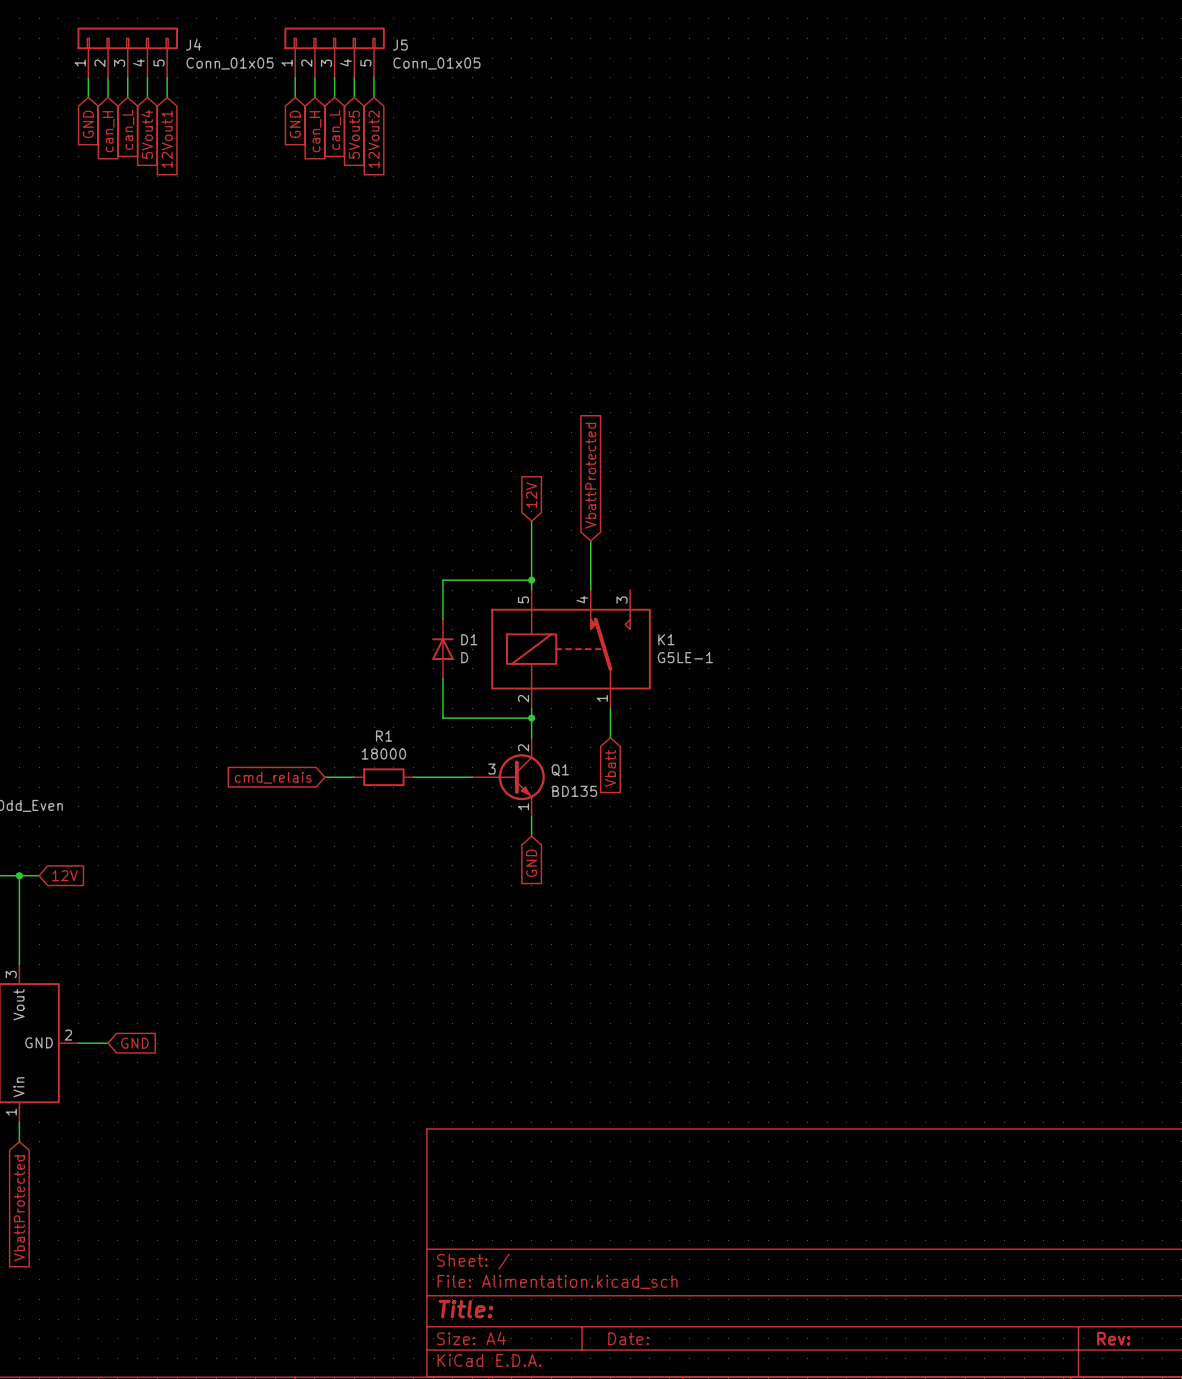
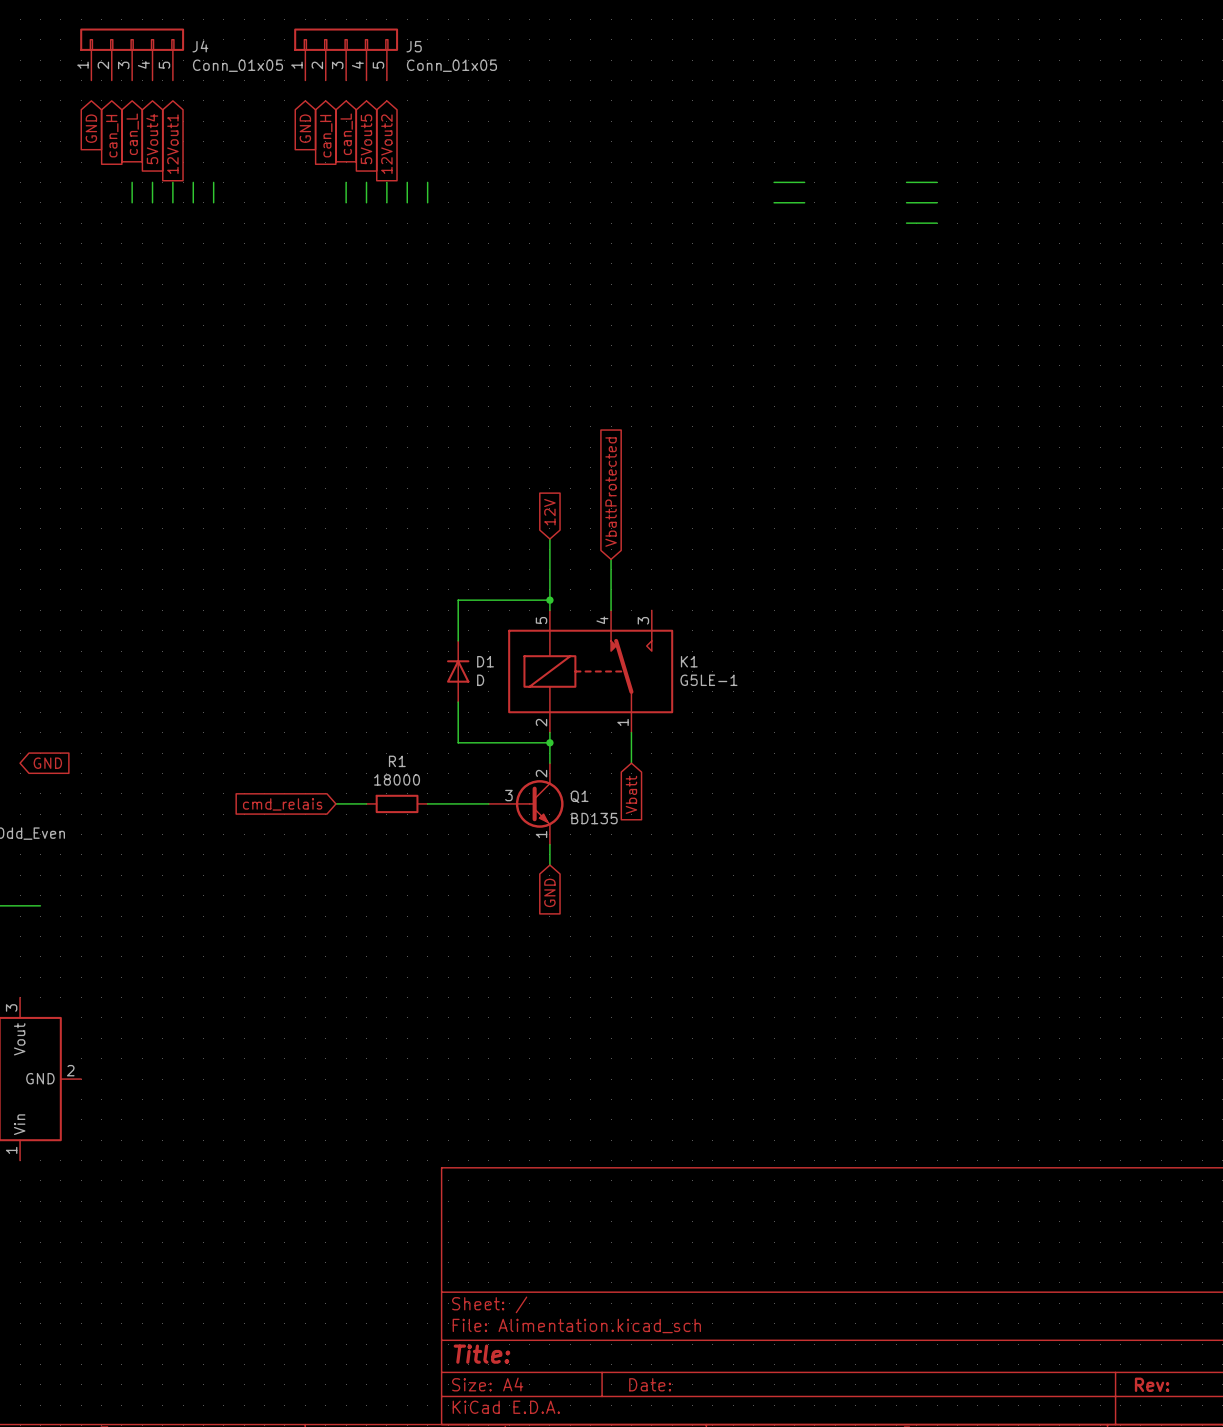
wire: (88, 77) (88, 97) -> (132, 182) (132, 202)
wire: (108, 77) (108, 97) -> (152, 182) (152, 202)
wire: (127, 77) (127, 97) -> (172, 182) (172, 202)
wire: (147, 77) (147, 97) -> (193, 182) (193, 202)
wire: (167, 77) (167, 97) -> (213, 182) (213, 202)
wire: (295, 77) (295, 97) -> (346, 182) (346, 202)
wire: (314, 77) (314, 97) -> (366, 182) (366, 202)
wire: (334, 77) (334, 97) -> (386, 182) (386, 202)
wire: (354, 77) (354, 97) -> (407, 182) (407, 202)
wire: (374, 77) (374, 97) -> (427, 182) (427, 202)
wire: none -> (774, 182) (804, 182)
wire: none -> (906, 182) (937, 182)
wire: none -> (774, 202) (804, 202)
wire: none -> (906, 202) (937, 202)
wire: none -> (906, 223) (937, 223)
global label: none -> GND (47, 763)
wire: (19, 875) (19, 964) -> none
junction: (19, 875) -> none
global label: 12V (65, 875) -> none
wire: (78, 1043) (108, 1043) -> none
global label: GND (134, 1043) -> none
wire: (19, 1122) (19, 1141) -> none
global label: VbattProtected (19, 1208) -> none

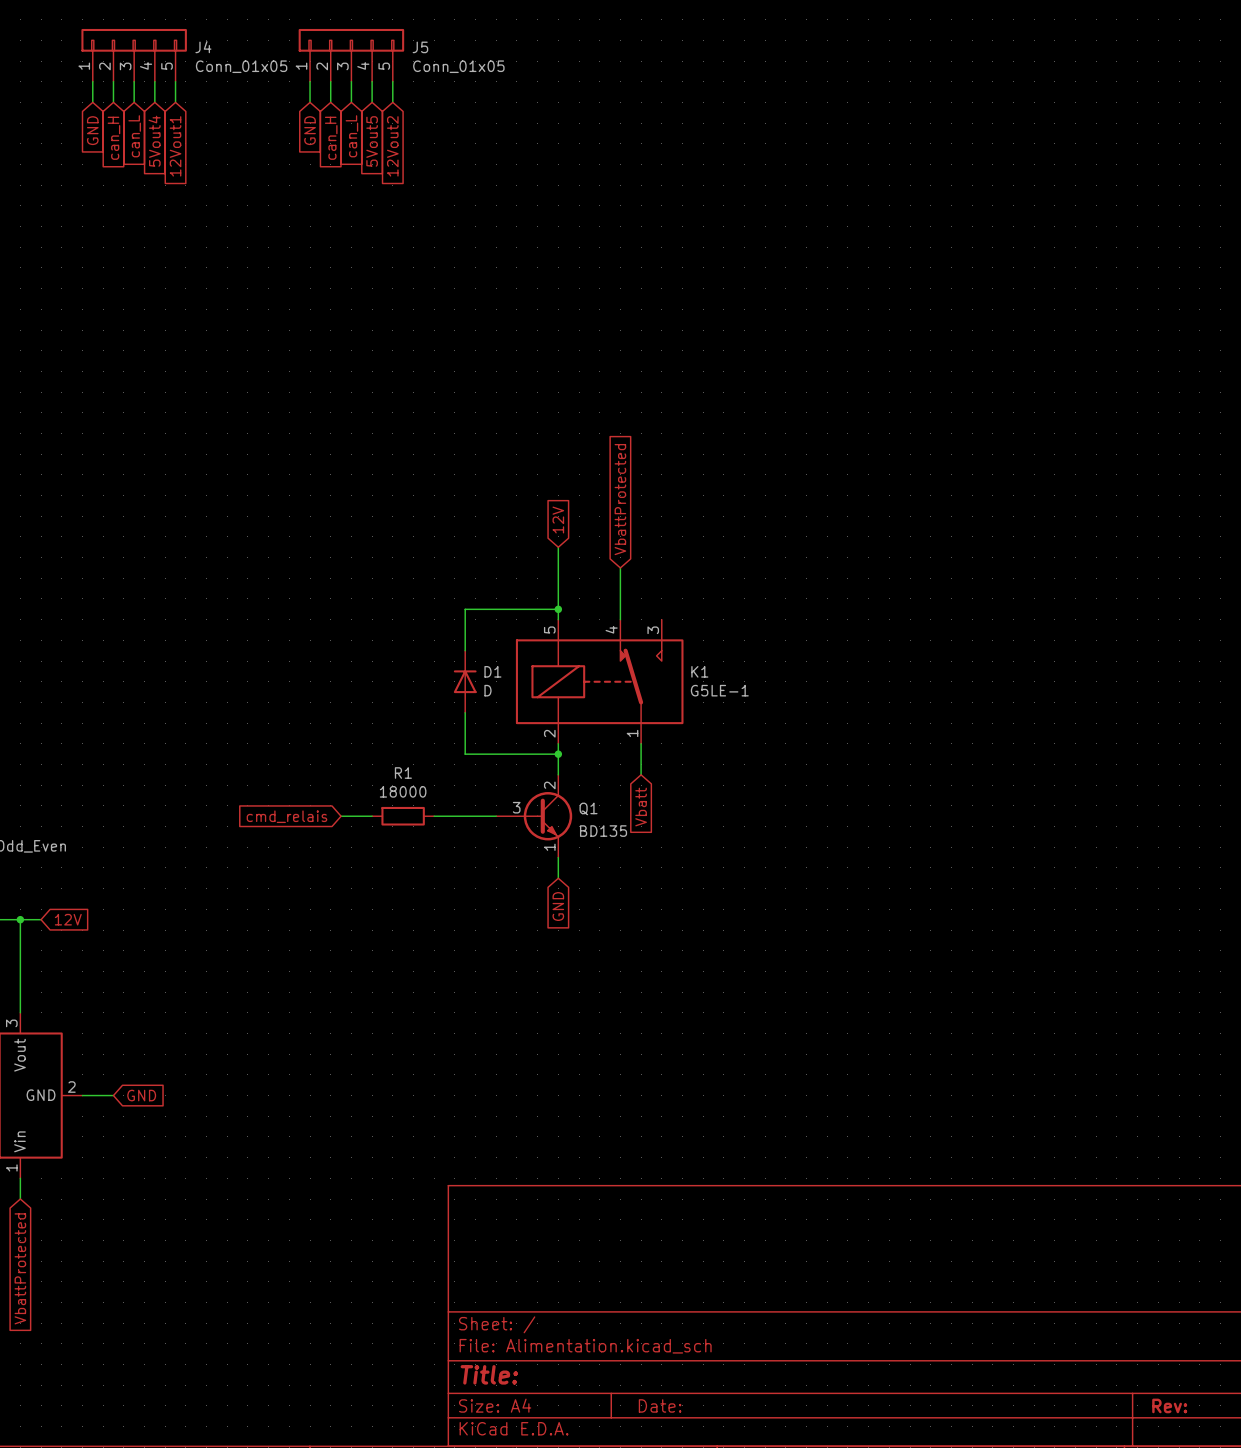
wire: (132, 182) (132, 202) -> (92, 81) (92, 102)
wire: (152, 182) (152, 202) -> (113, 81) (113, 102)
wire: (172, 182) (172, 202) -> (134, 81) (134, 102)
wire: (193, 182) (193, 202) -> (154, 81) (154, 102)
wire: (213, 182) (213, 202) -> (175, 81) (175, 102)
wire: (346, 182) (346, 202) -> (310, 81) (310, 102)
wire: (366, 182) (366, 202) -> (330, 81) (330, 102)
wire: (386, 182) (386, 202) -> (351, 81) (351, 102)
wire: (407, 182) (407, 202) -> (372, 81) (372, 102)
wire: (427, 182) (427, 202) -> (392, 81) (392, 102)
wire: (774, 182) (804, 182) -> none
wire: (906, 182) (937, 182) -> none
wire: (774, 202) (804, 202) -> none
wire: (906, 202) (937, 202) -> none
wire: (906, 223) (937, 223) -> none
global label: GND (47, 763) -> none
wire: none -> (20, 919) (20, 1012)
junction: none -> (20, 919)
global label: none -> 12V (68, 919)
wire: none -> (82, 1095) (113, 1095)
global label: none -> GND (141, 1095)
wire: none -> (20, 1178) (20, 1199)
global label: none -> VbattProtected (20, 1268)

